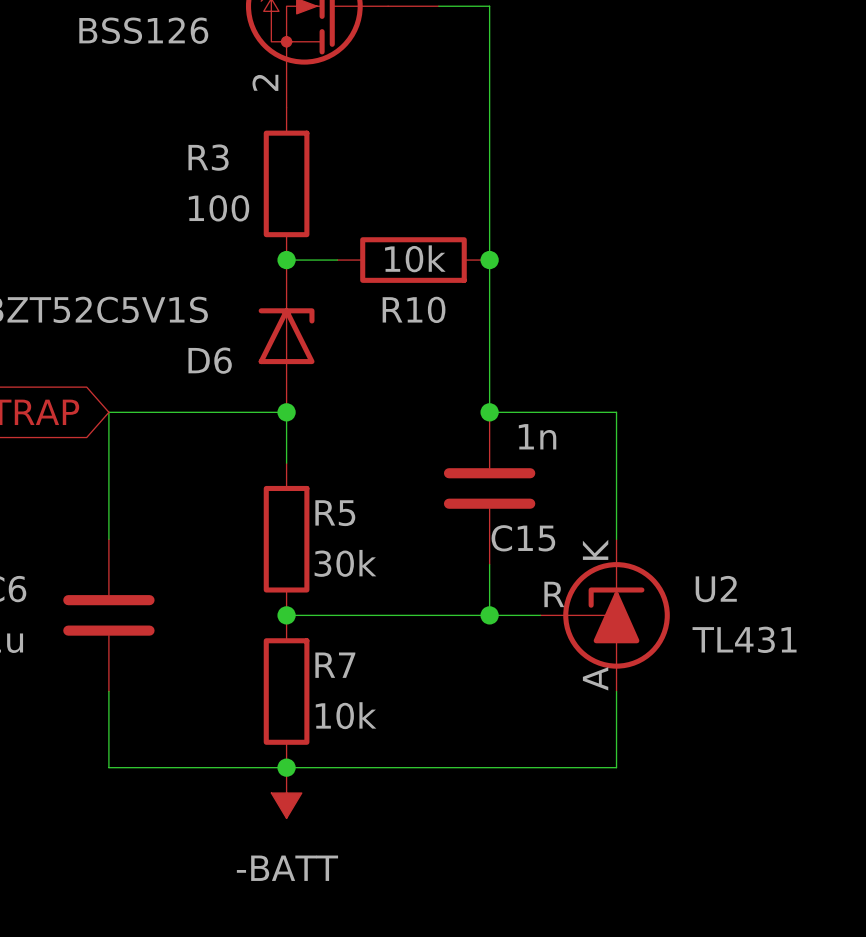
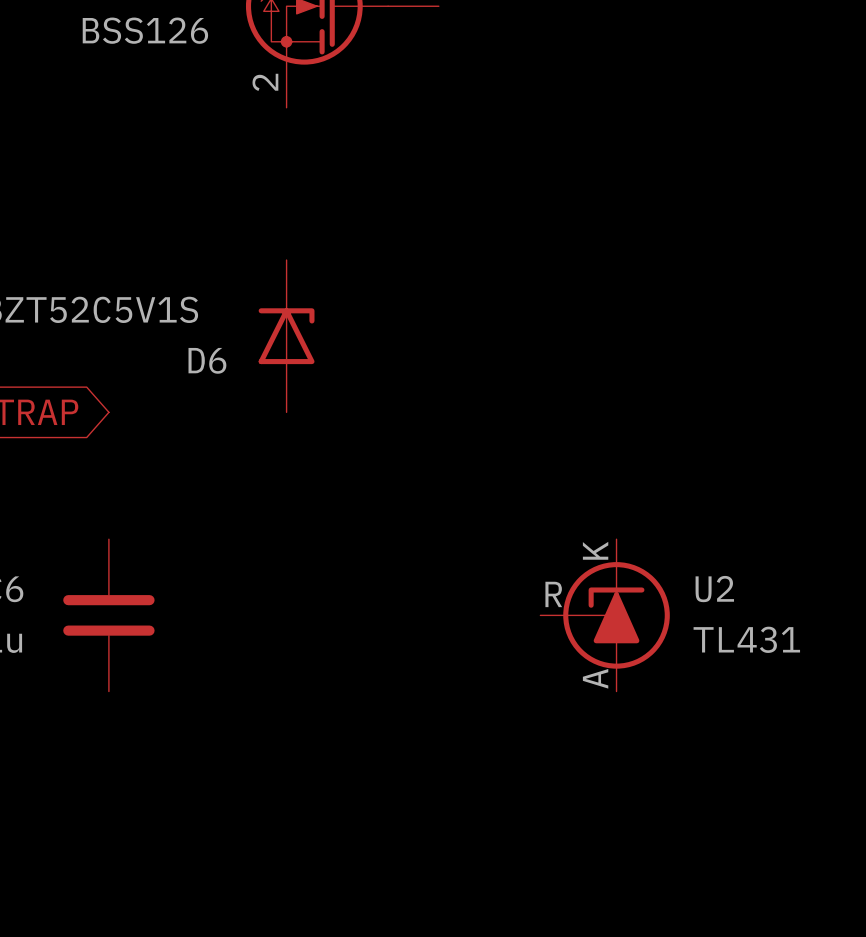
wire: (438, 6) (489, 6) (489, 412) (616, 412) (616, 539) -> none
R3: 100 (286, 183) -> none
wire: (286, 260) (337, 260) -> none
junction: (286, 260) -> none
R10: 10k (413, 260) -> none
junction: (489, 260) -> none
junction: (286, 412) -> none
junction: (489, 412) -> none
wire: (286, 463) (286, 412) (108, 412) (108, 539) -> none
C15: 1n (489, 488) -> none
R5: 30k (286, 539) -> none
wire: (489, 564) (489, 615) -> none
wire: (286, 615) (540, 615) -> none
junction: (286, 615) -> none
junction: (489, 615) -> none
wire: (108, 691) (108, 767) (616, 767) (616, 691) -> none
R7: 10k (286, 691) -> none
junction: (286, 767) -> none
power symbol: -BATT (286, 793) -> none

